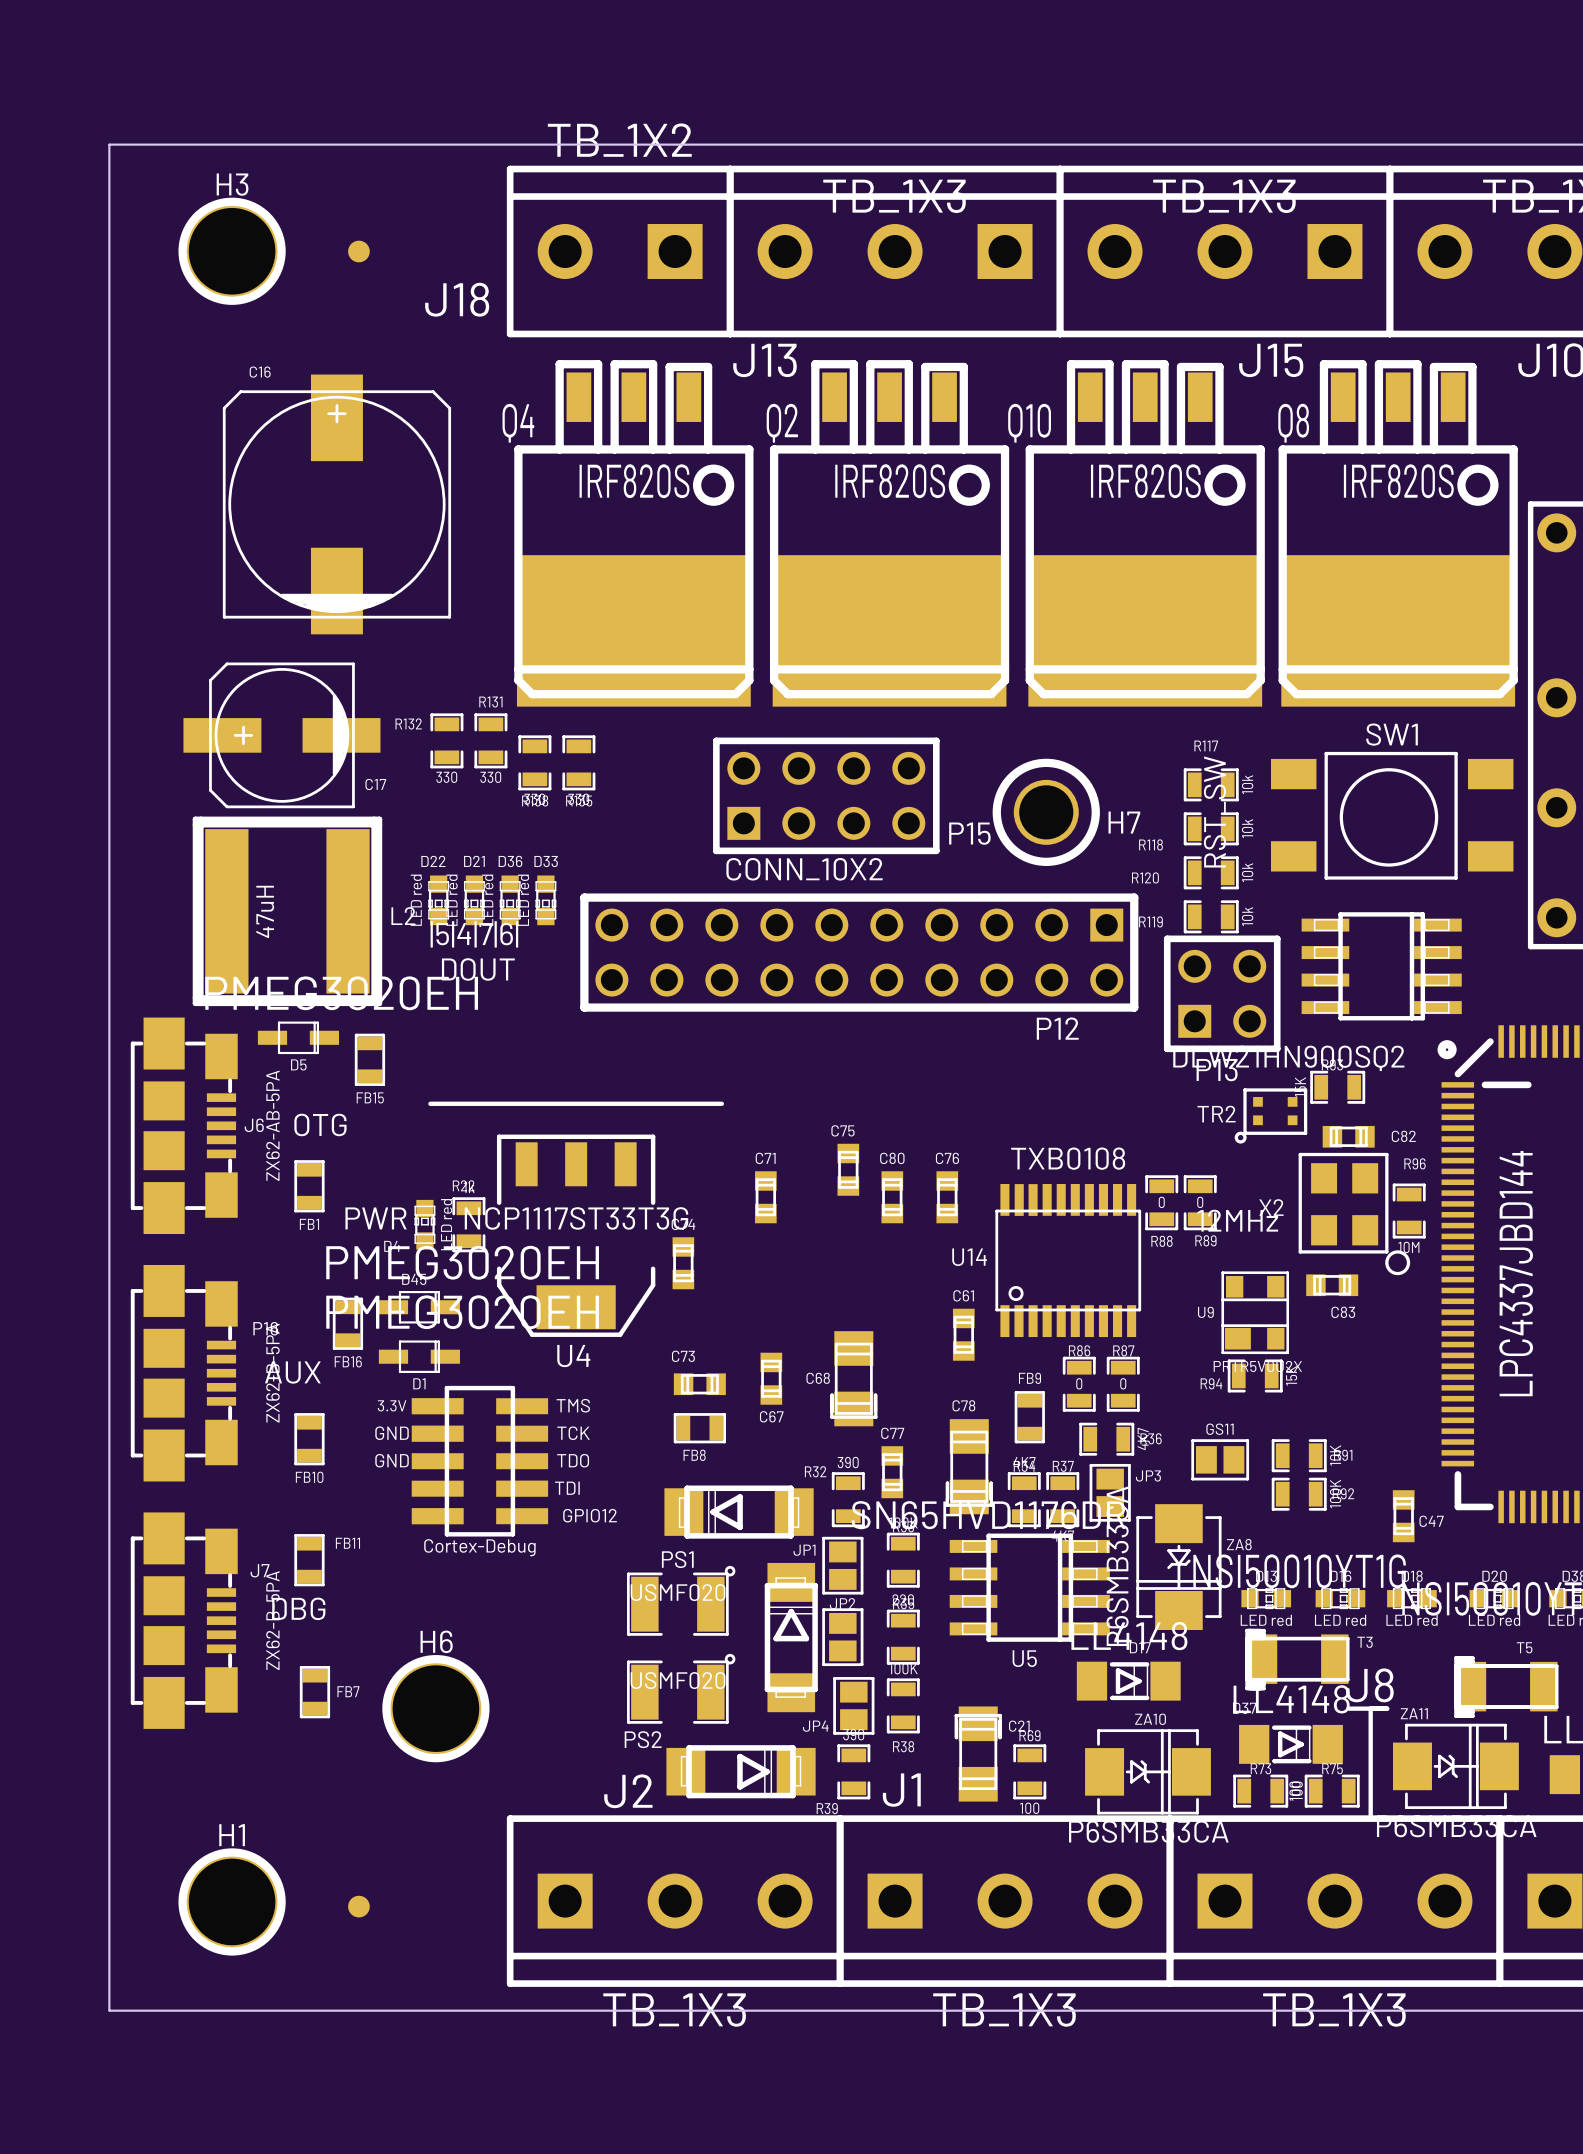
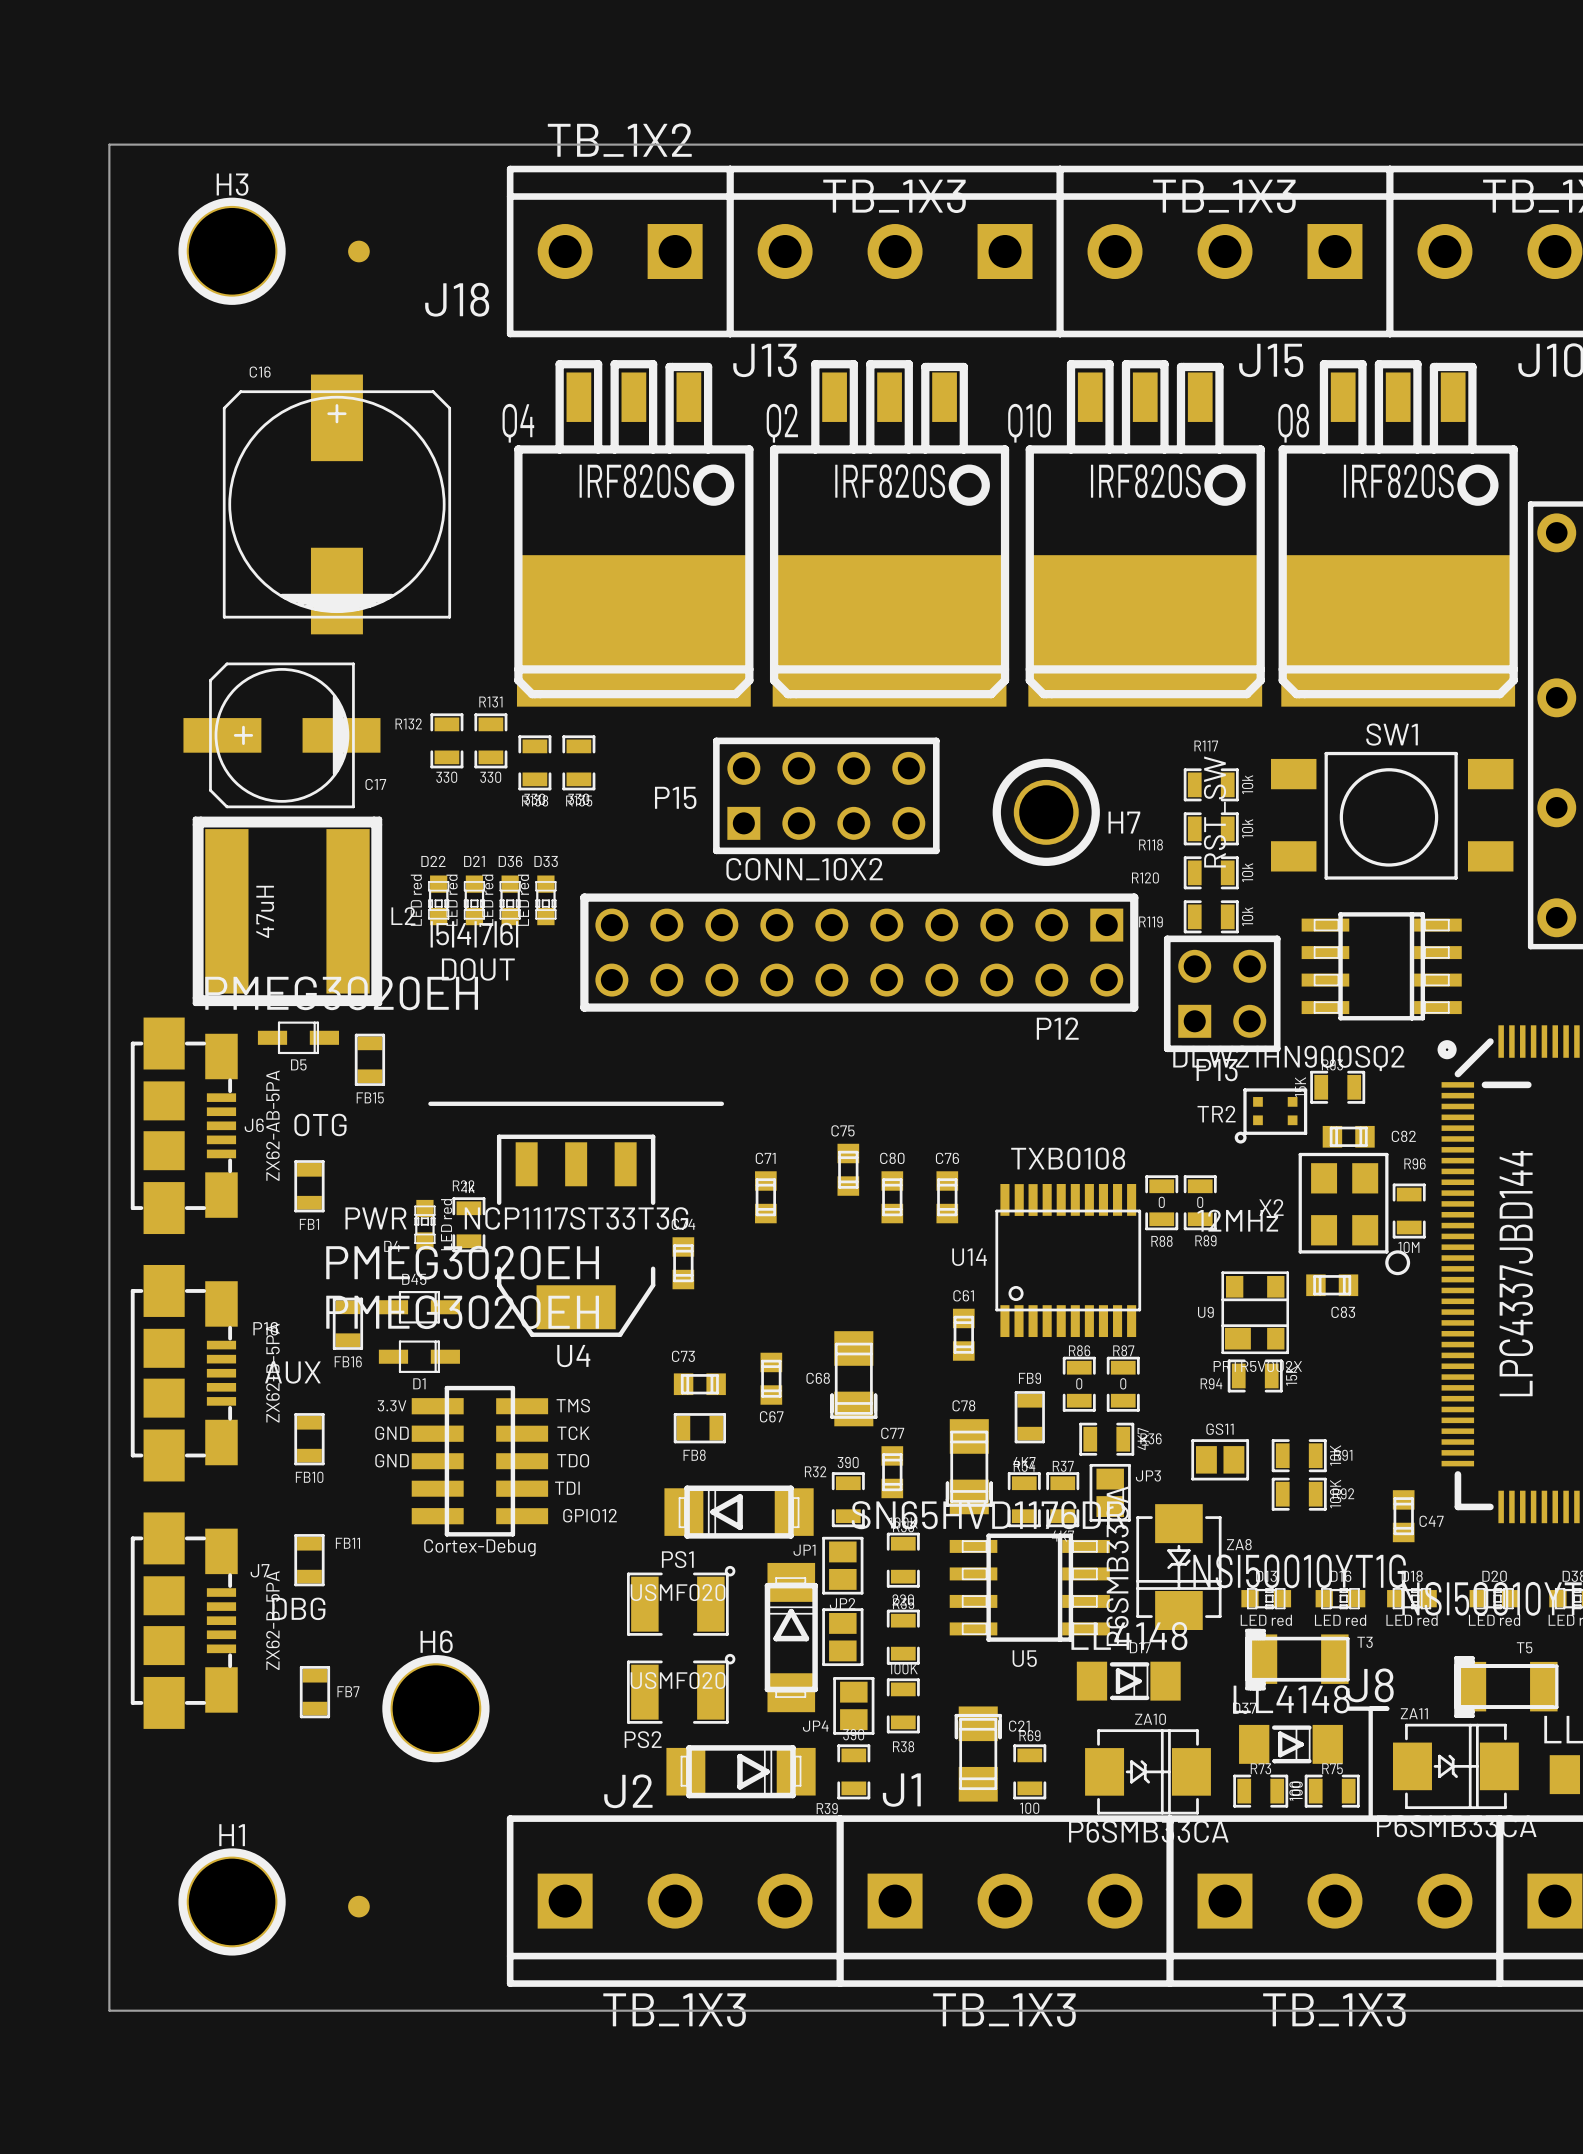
P15 name position: P15 (969, 833) -> P15 (675, 797)

